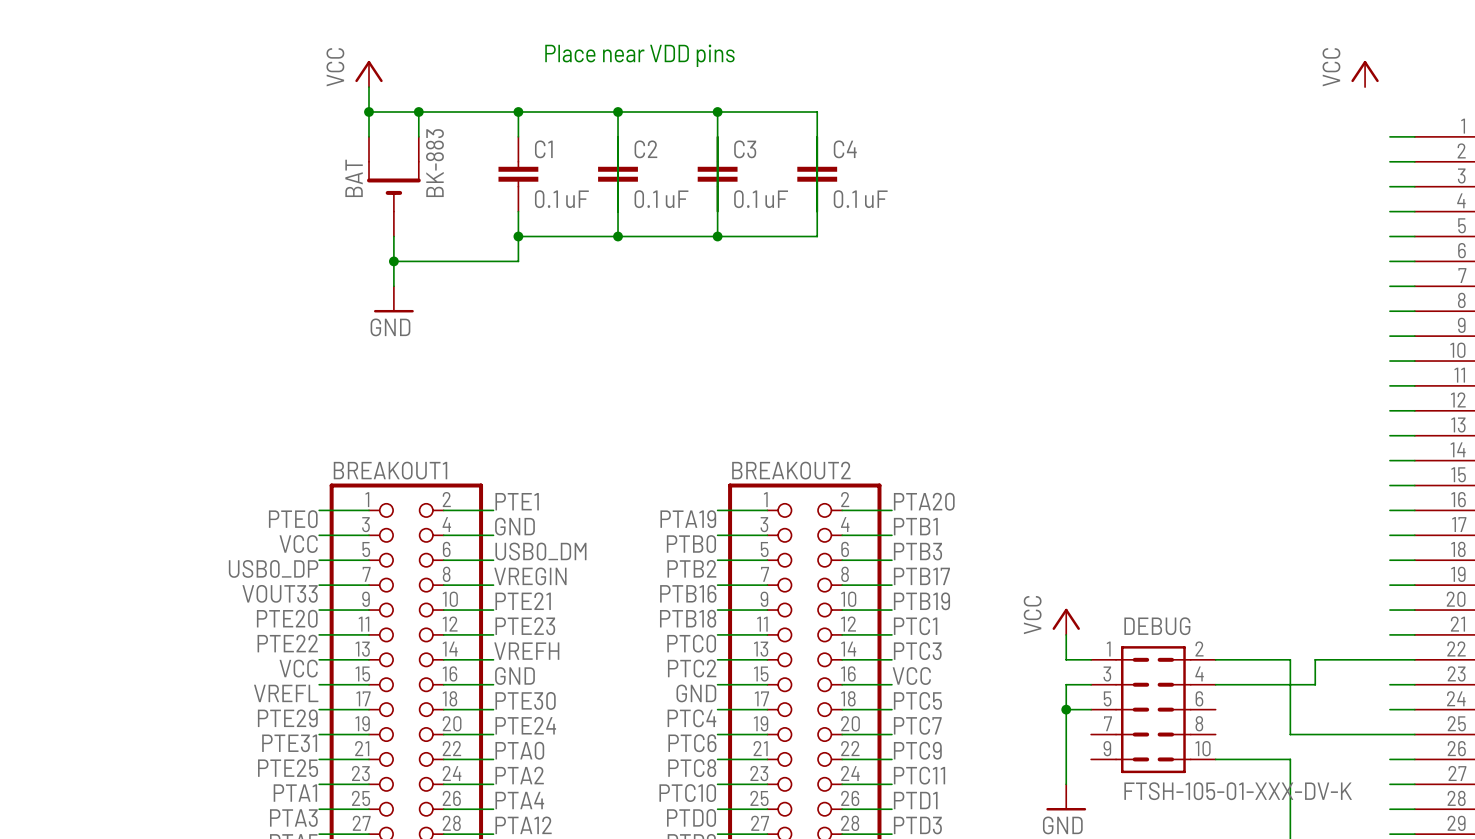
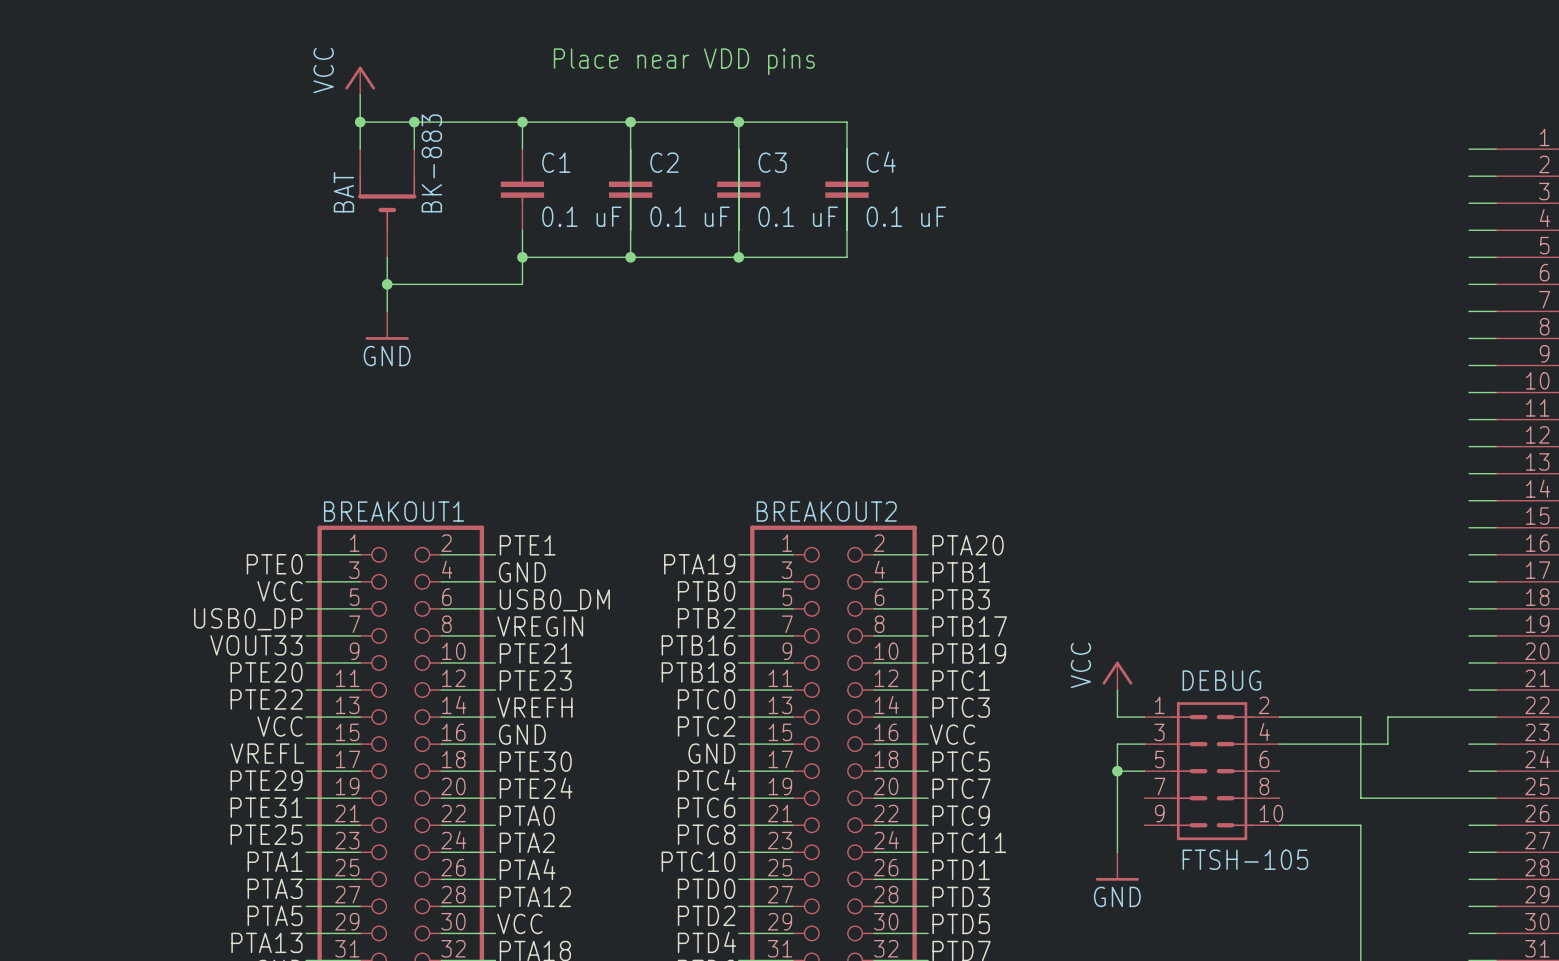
power symbol: VCC (1365, 74) -> none
DEBUG value: FTSH-105-01-XXX-DV-K (1238, 791) -> FTSH-105 (1245, 859)

